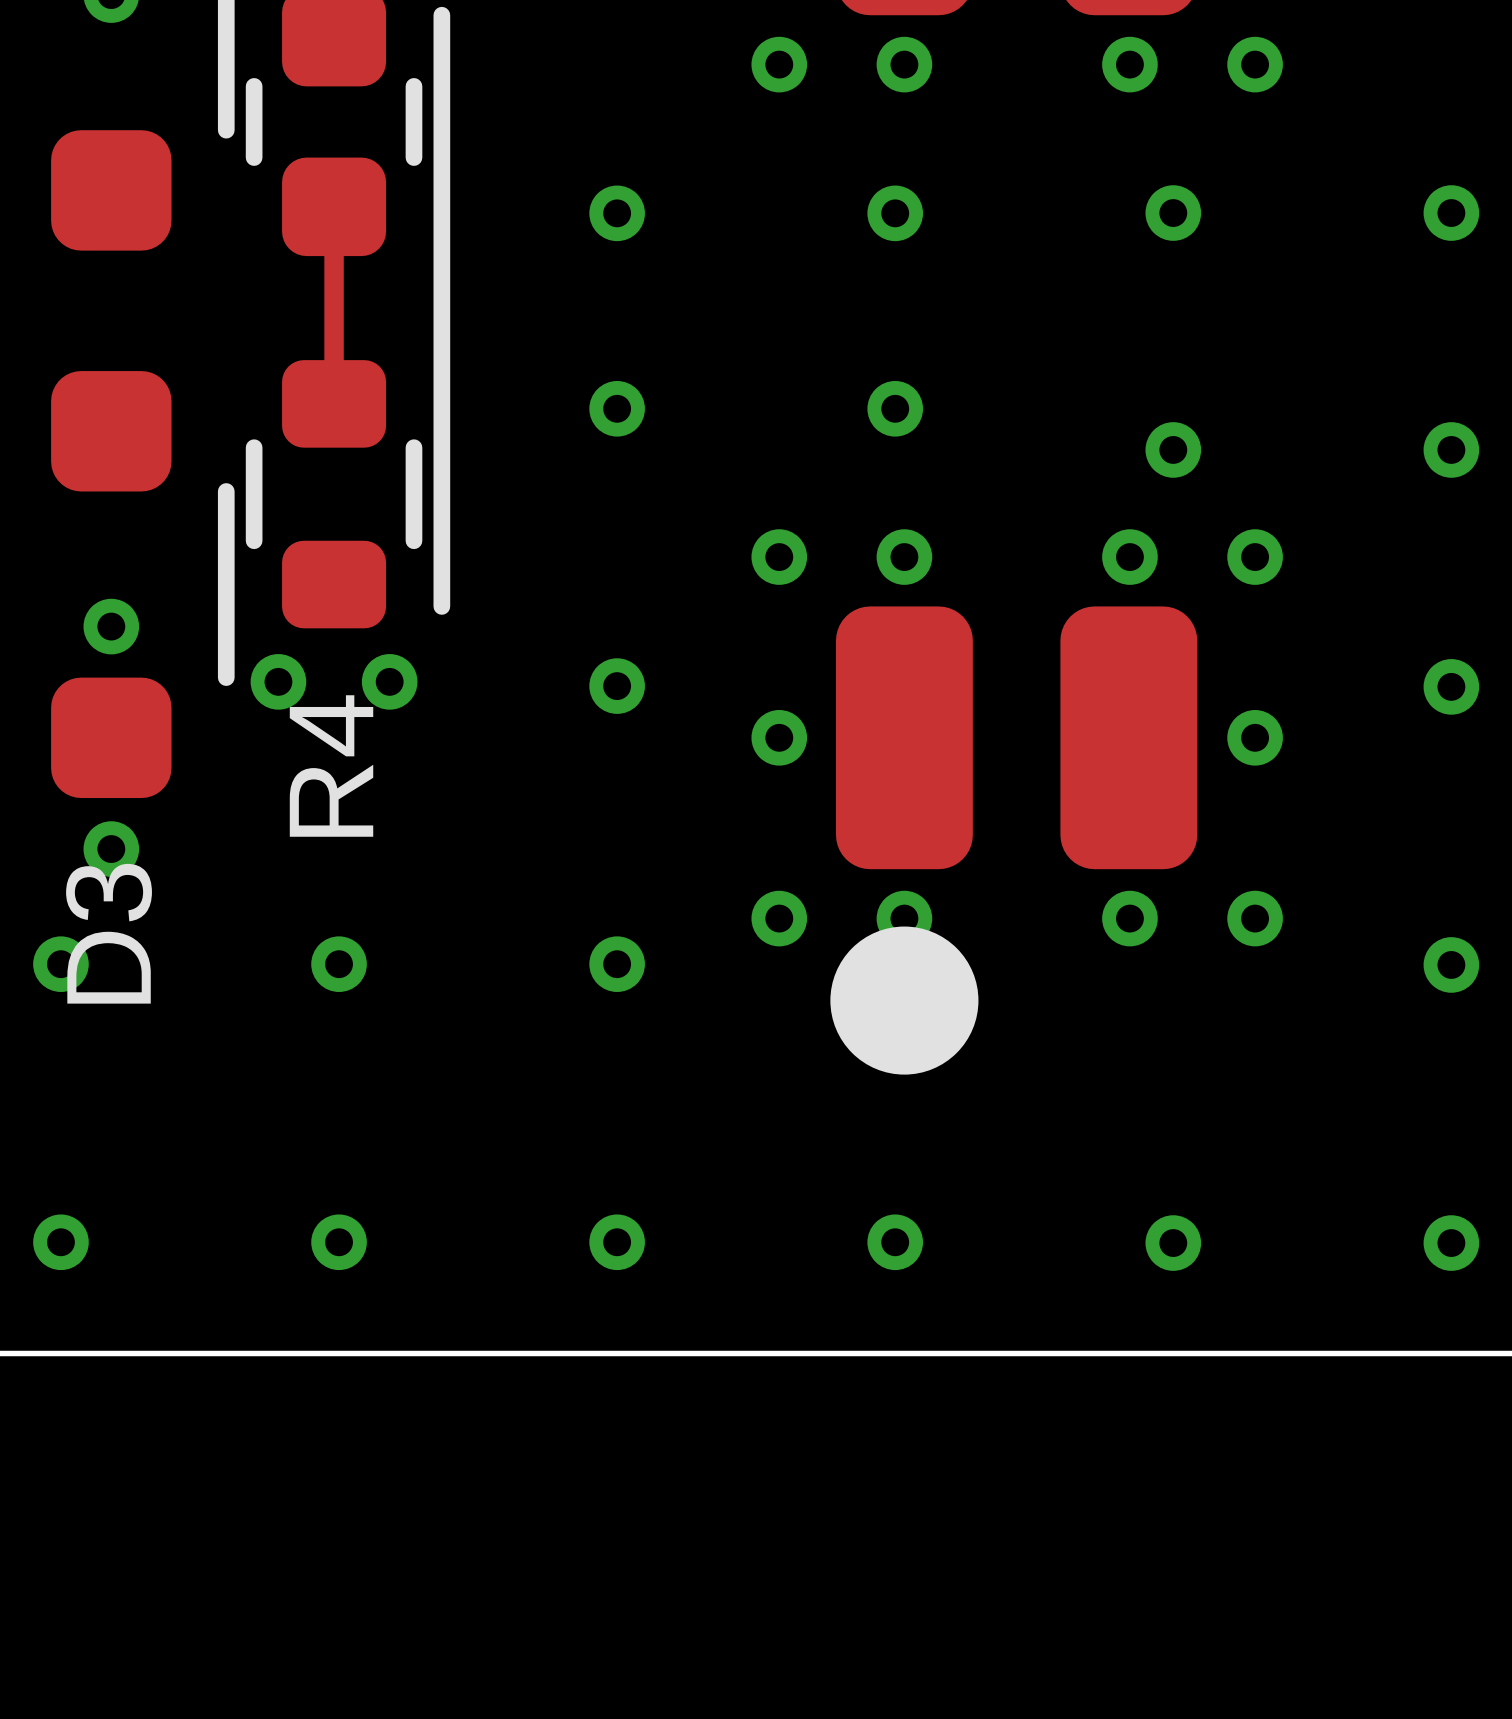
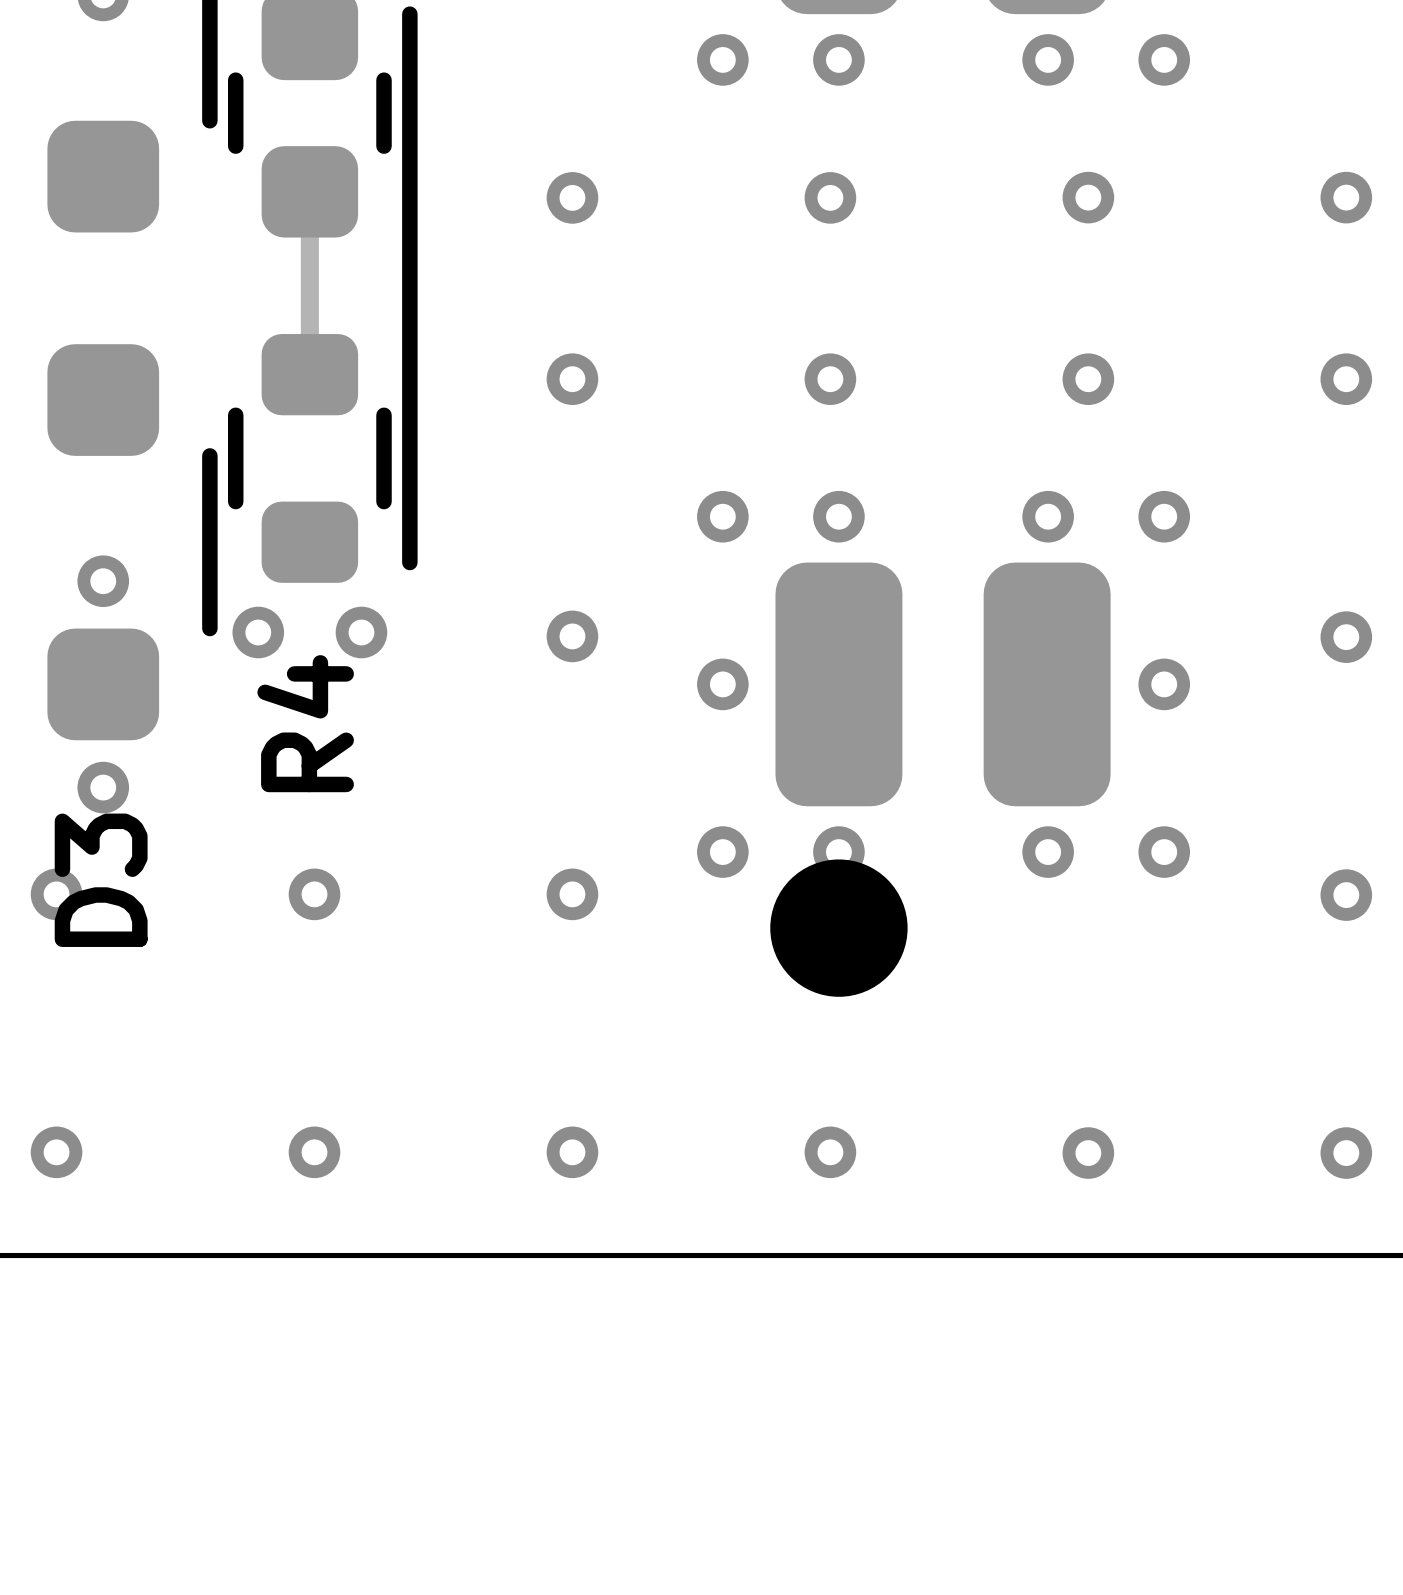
via position: (1173, 449) -> (1088, 379)
via position: (1451, 449) -> (1346, 379)

